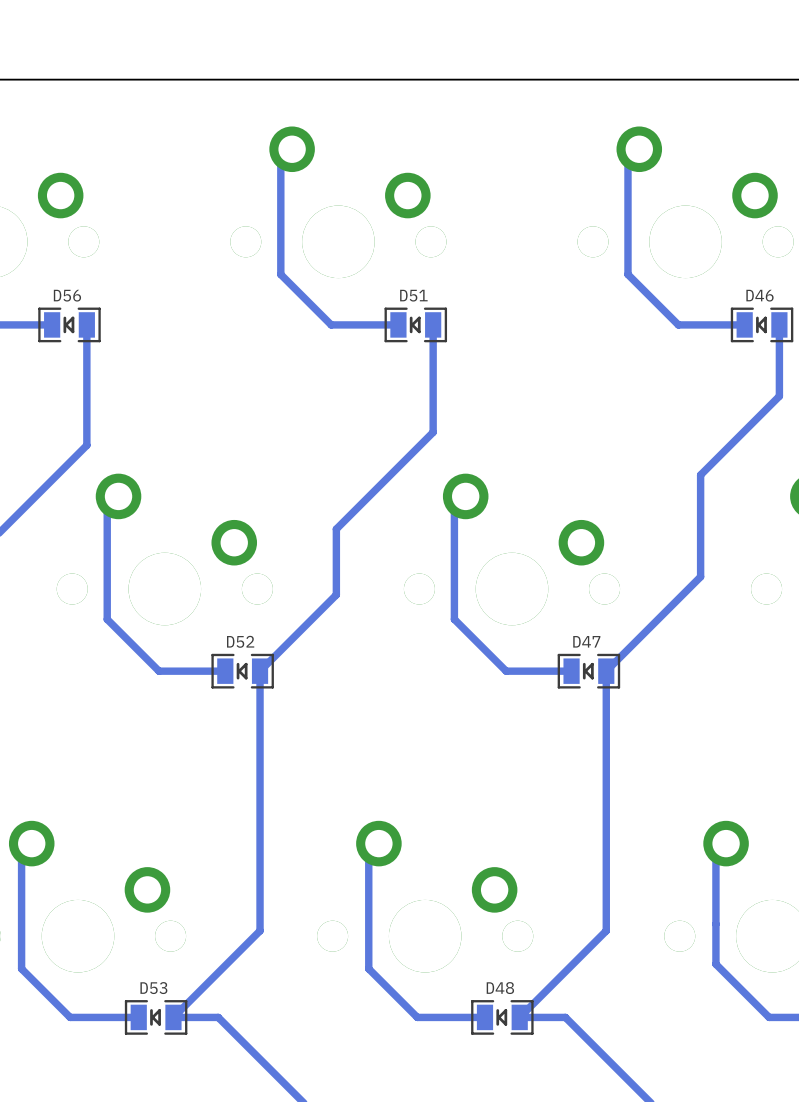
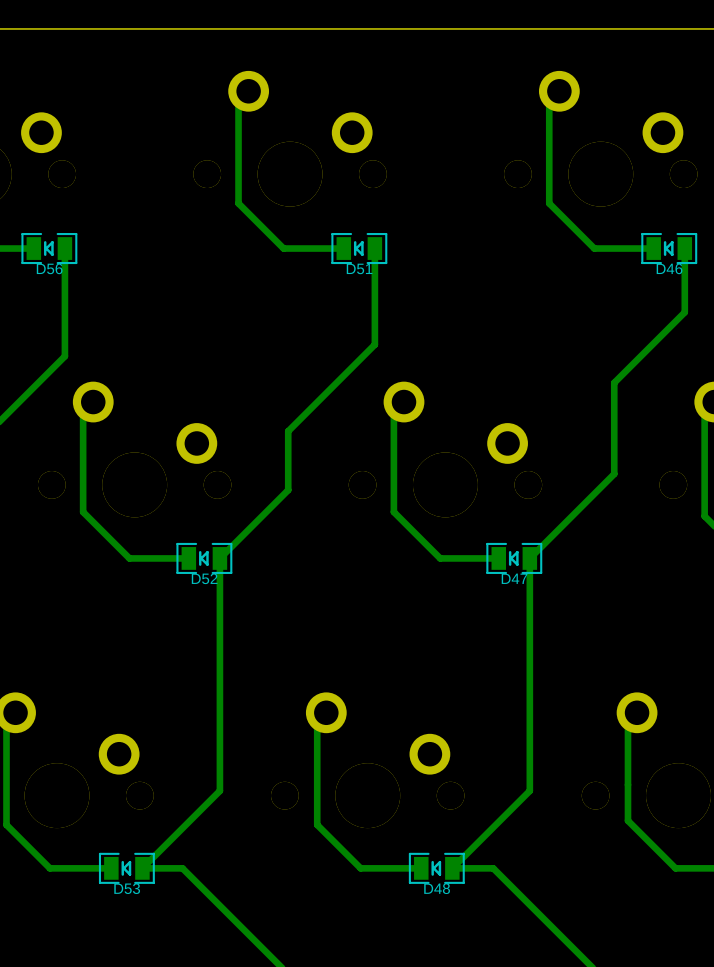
D56 name position: D56 (67, 295) -> D56 (49, 268)
D51 name position: D51 (413, 295) -> D51 (359, 268)
D46 name position: D46 (759, 295) -> D46 (669, 268)
D52 name position: D52 (240, 641) -> D52 (204, 578)
D47 name position: D47 (586, 641) -> D47 (514, 578)
D53 name position: D53 (153, 988) -> D53 (127, 888)
D48 name position: D48 (500, 988) -> D48 (437, 888)

